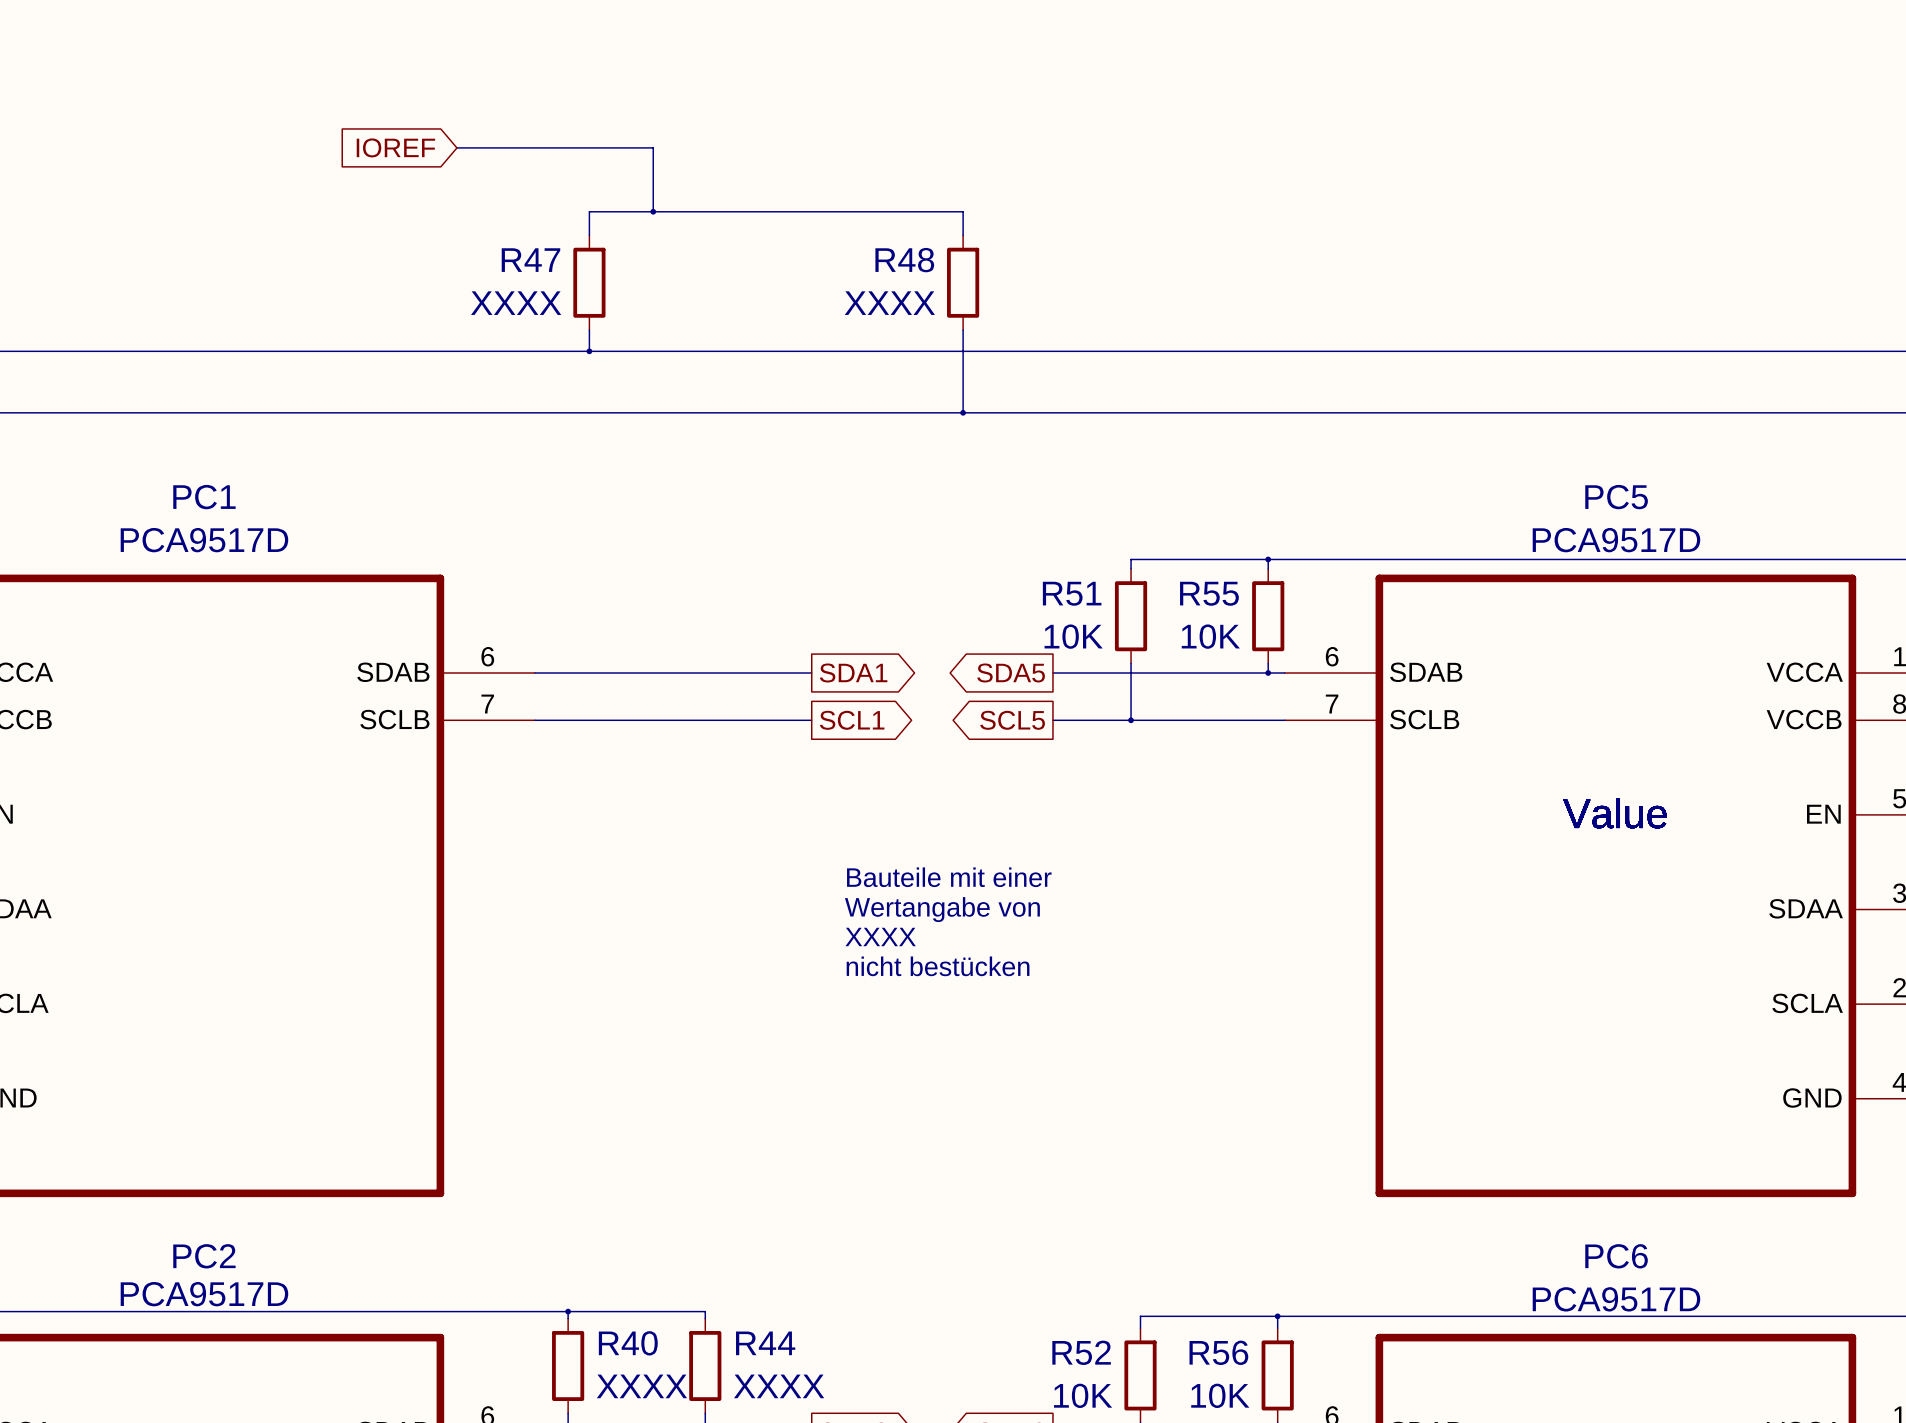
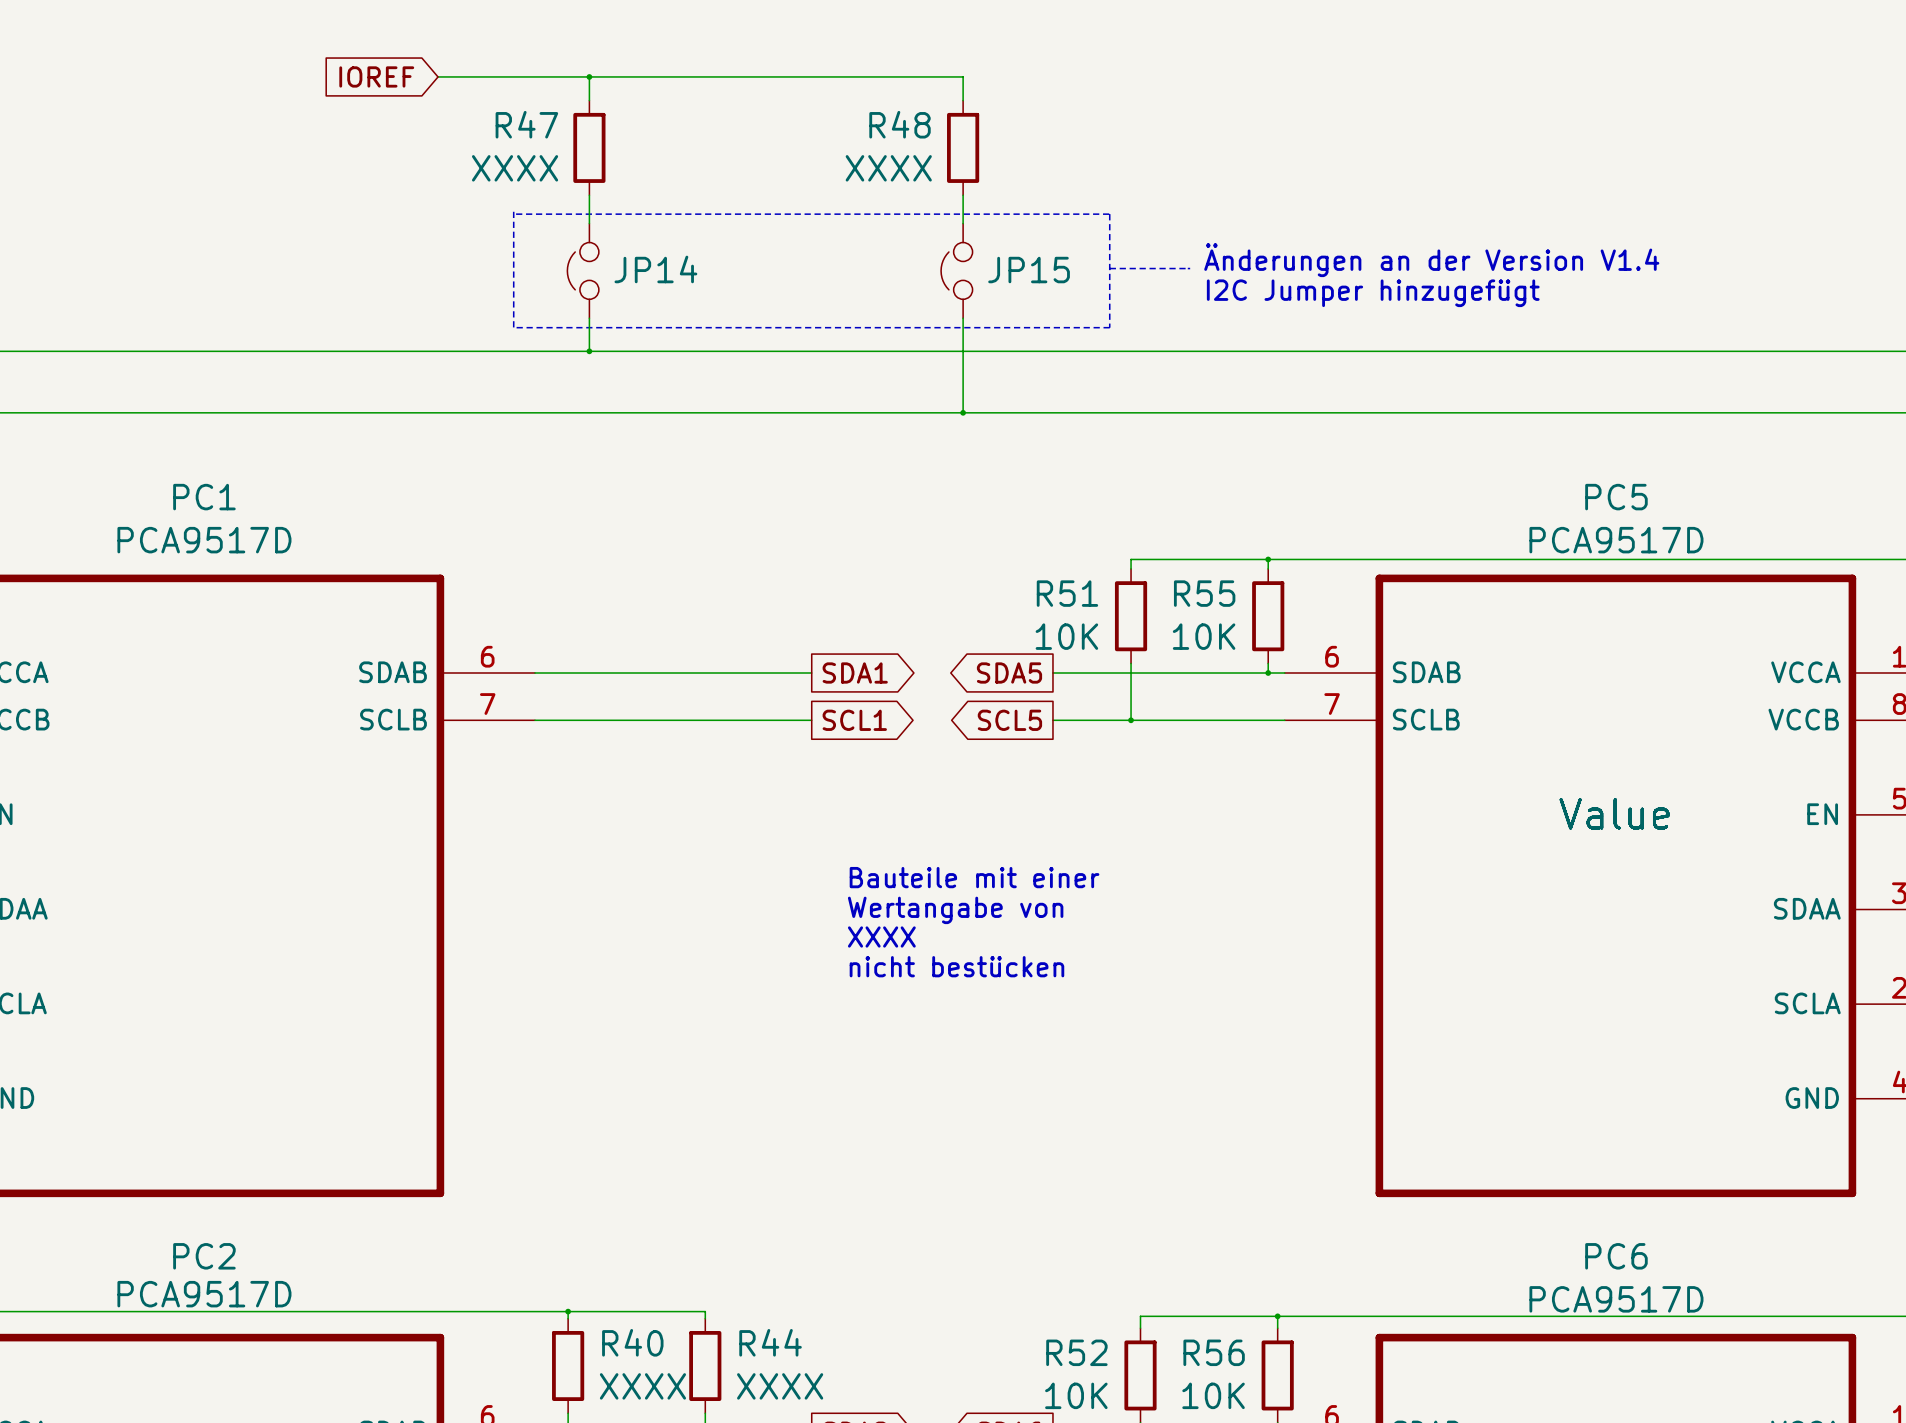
wire: none -> (438, 76) (963, 76) (963, 100)
wire: none -> (589, 76) (589, 100)
junction: none -> (589, 76)
global label position: IOREF (395, 147) -> IOREF (376, 76)
wire: (456, 147) (653, 147) (653, 211) -> none
wire: none -> (963, 195) (963, 211)
line: none -> (513, 211) (513, 327) (1109, 327) (1109, 214) (516, 214)
wire: (589, 211) (963, 211) -> (589, 211) (589, 195)
junction: (653, 211) -> none
text: none -> Änderungen an der Version V1.4 (1431, 260)
line: none -> (1109, 268) (1190, 268)
JP14: none -> (583, 270)
JP15: none -> (956, 270)
R47 position: (589, 282) -> (589, 147)
R48 position: (963, 282) -> (963, 147)
text: none -> I2C Jumper hinzugefügt (1373, 293)

